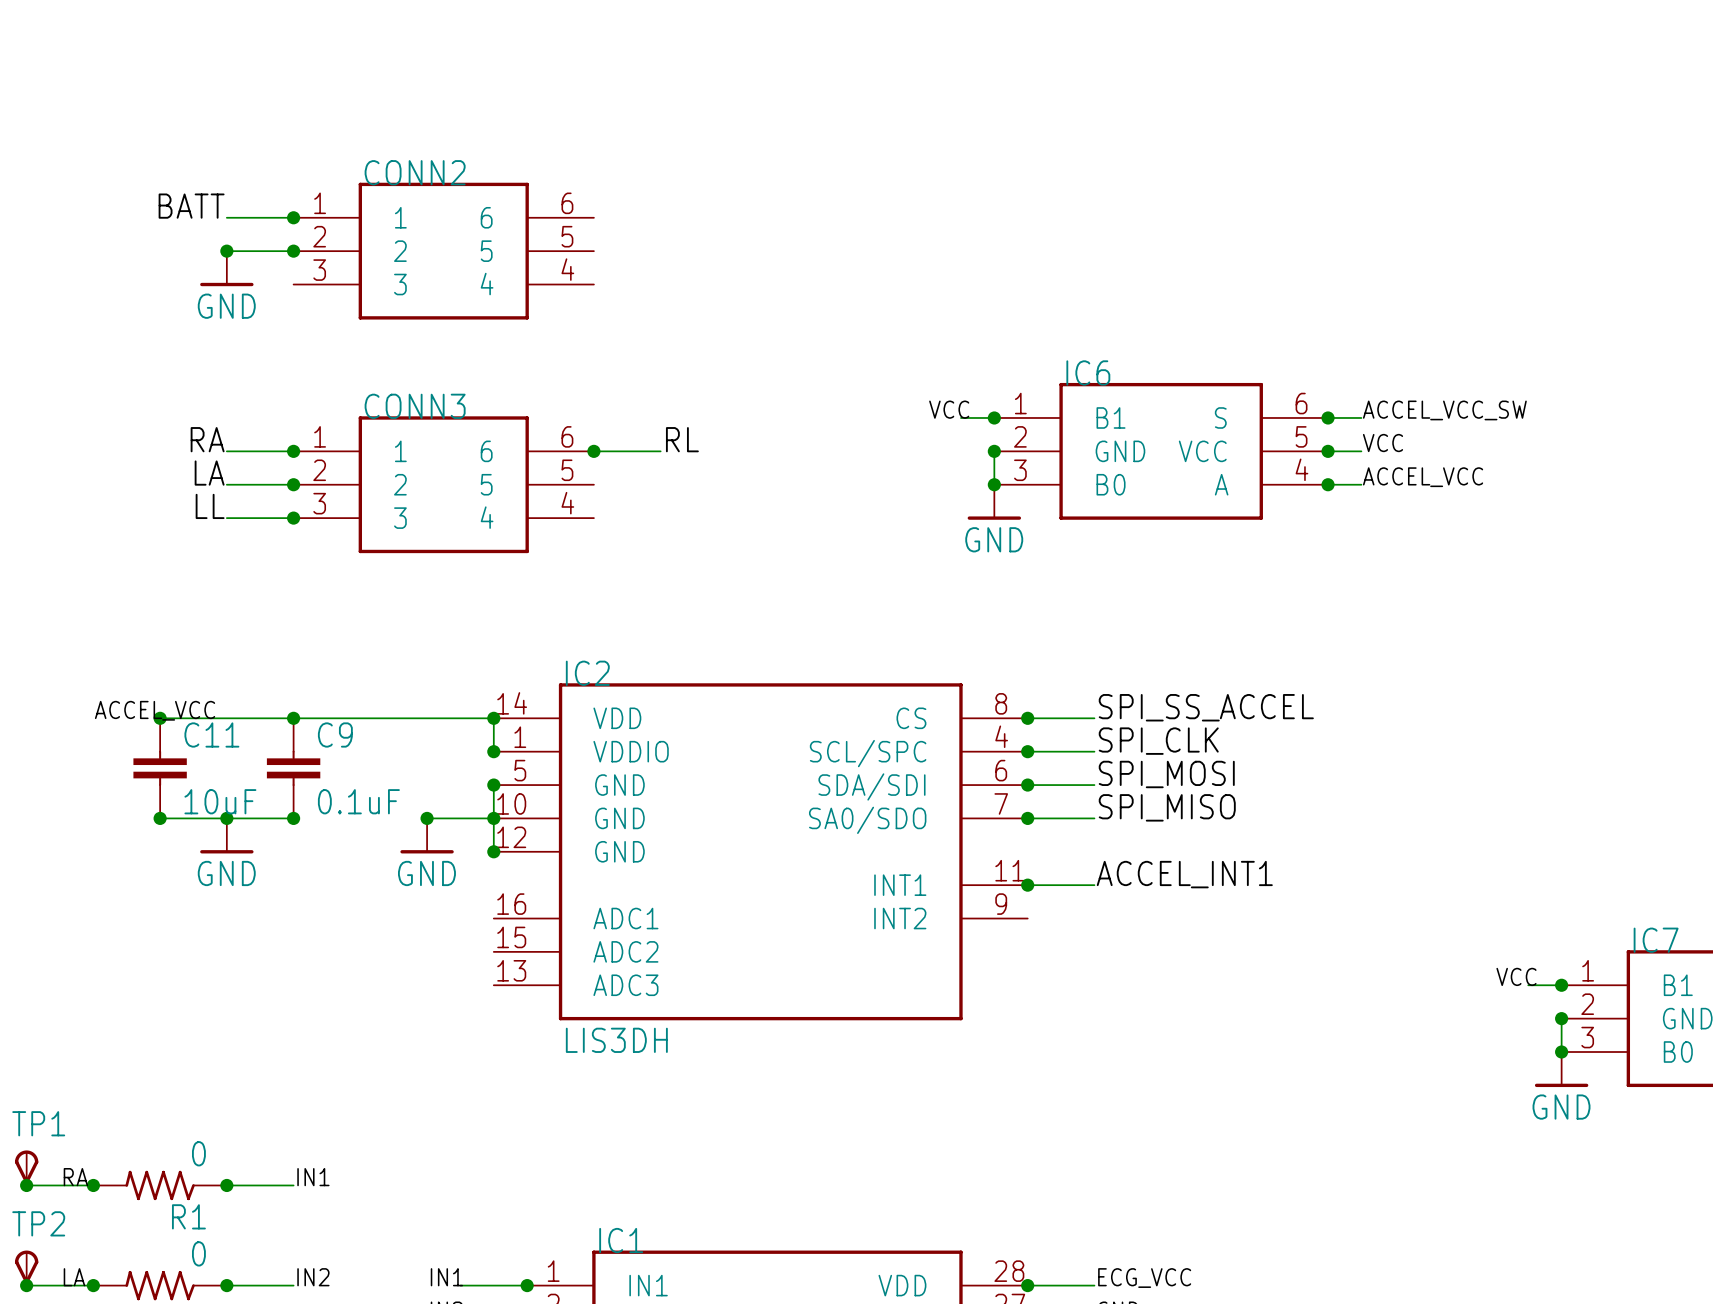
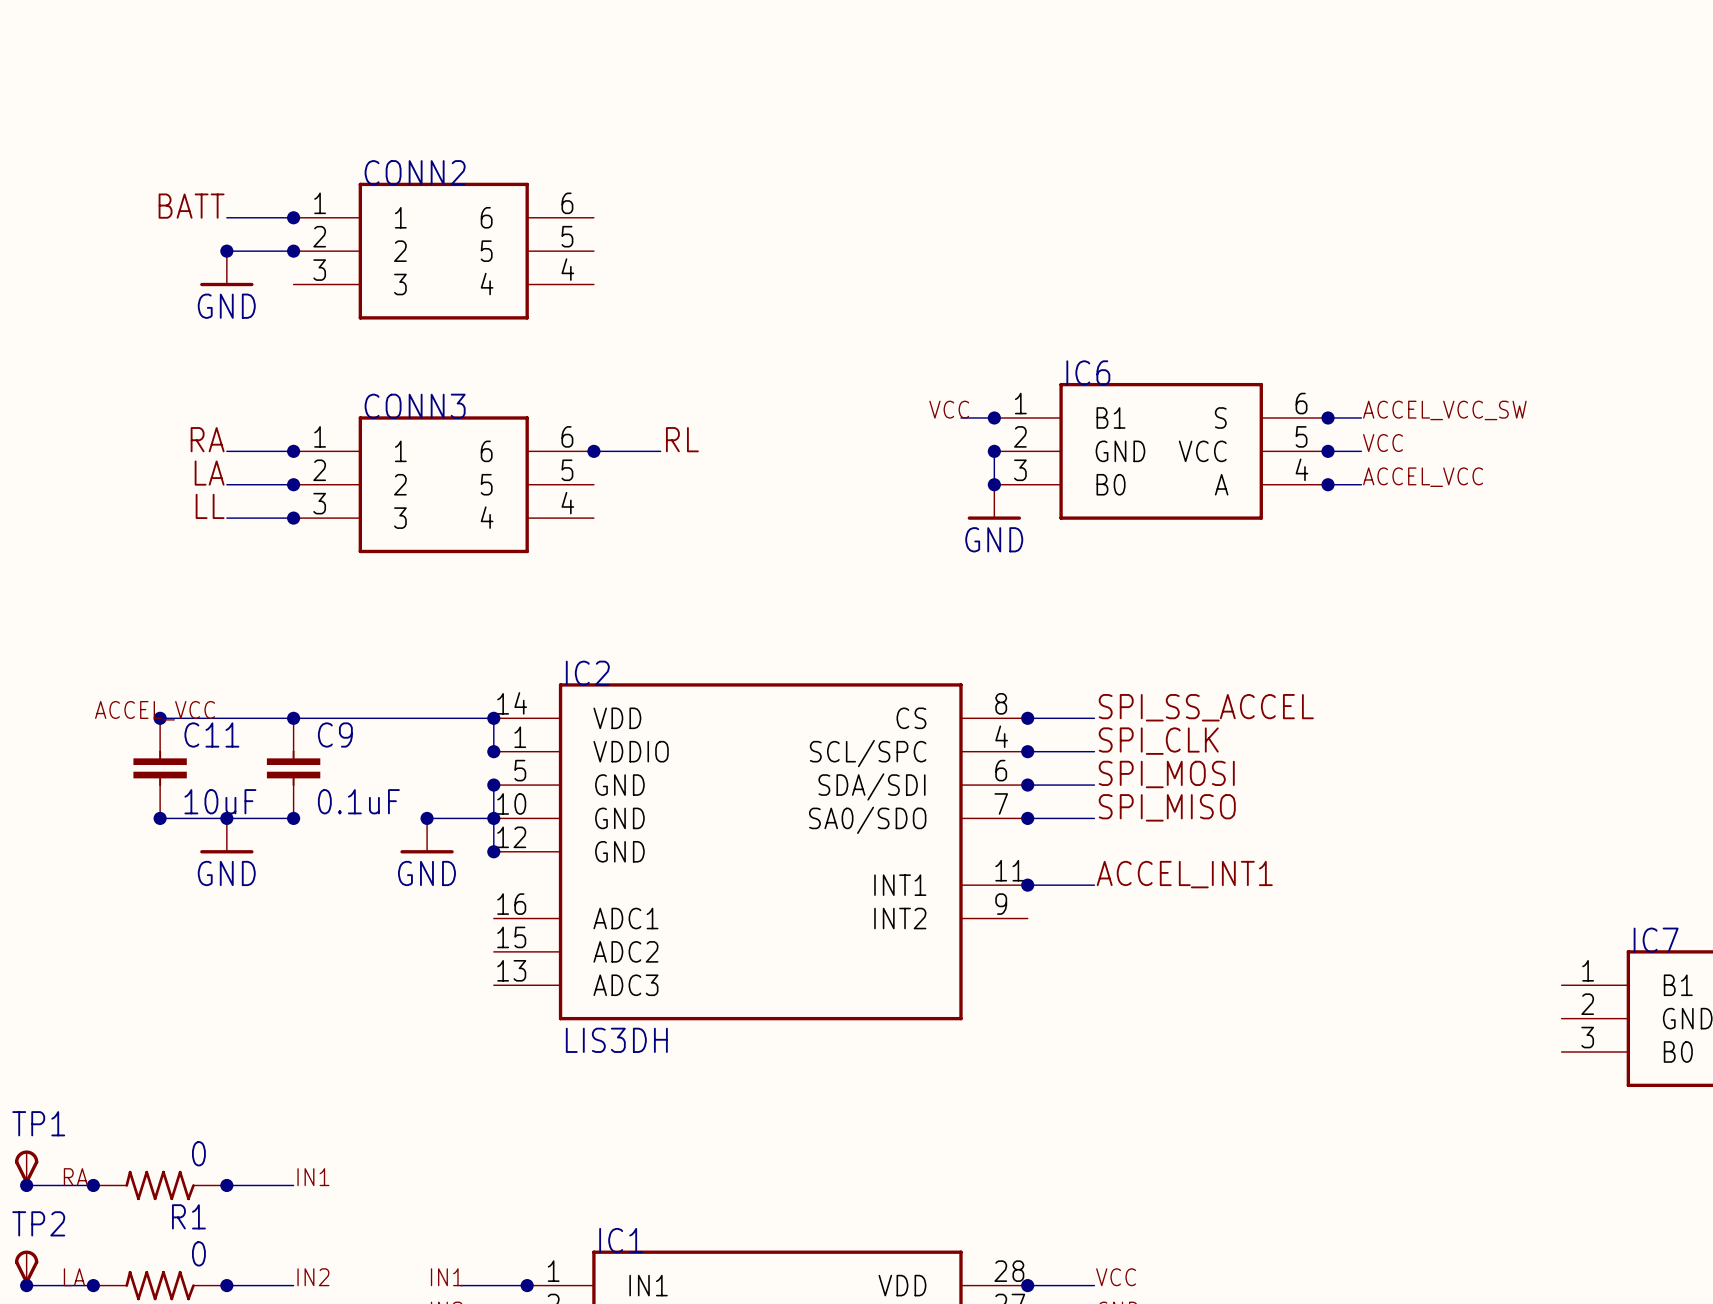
label: VCC (1516, 976) -> none
wire: (1528, 985) (1561, 985) -> none
junction: (1561, 985) -> none
wire: (1561, 1018) (1561, 1052) -> none
junction: (1561, 1018) -> none
junction: (1561, 1052) -> none
power symbol: GND (1561, 1069) -> none
label: ECG_VCC (1144, 1278) -> VCC (1116, 1277)

